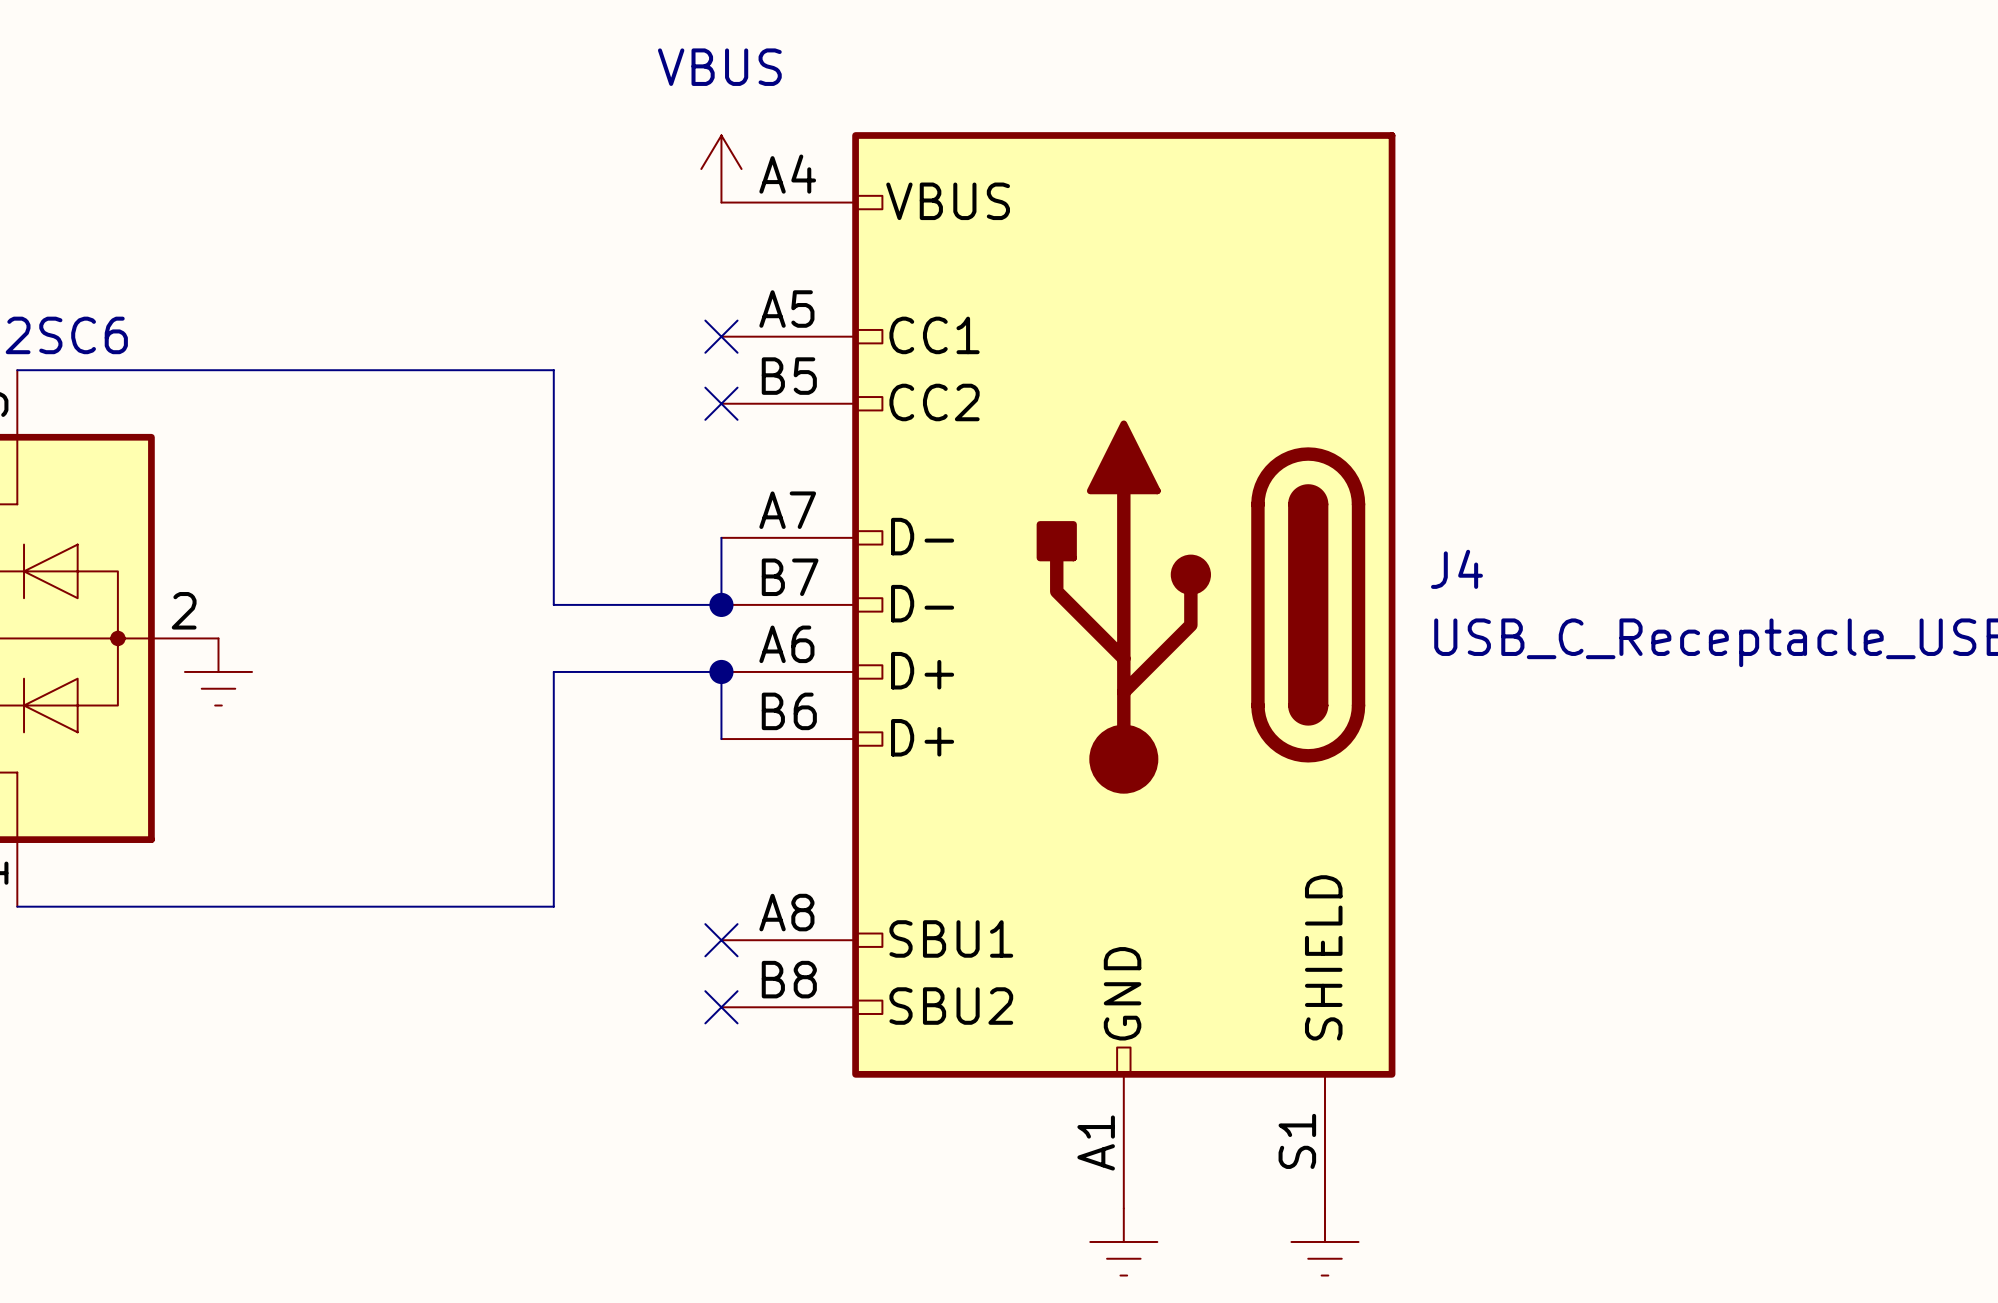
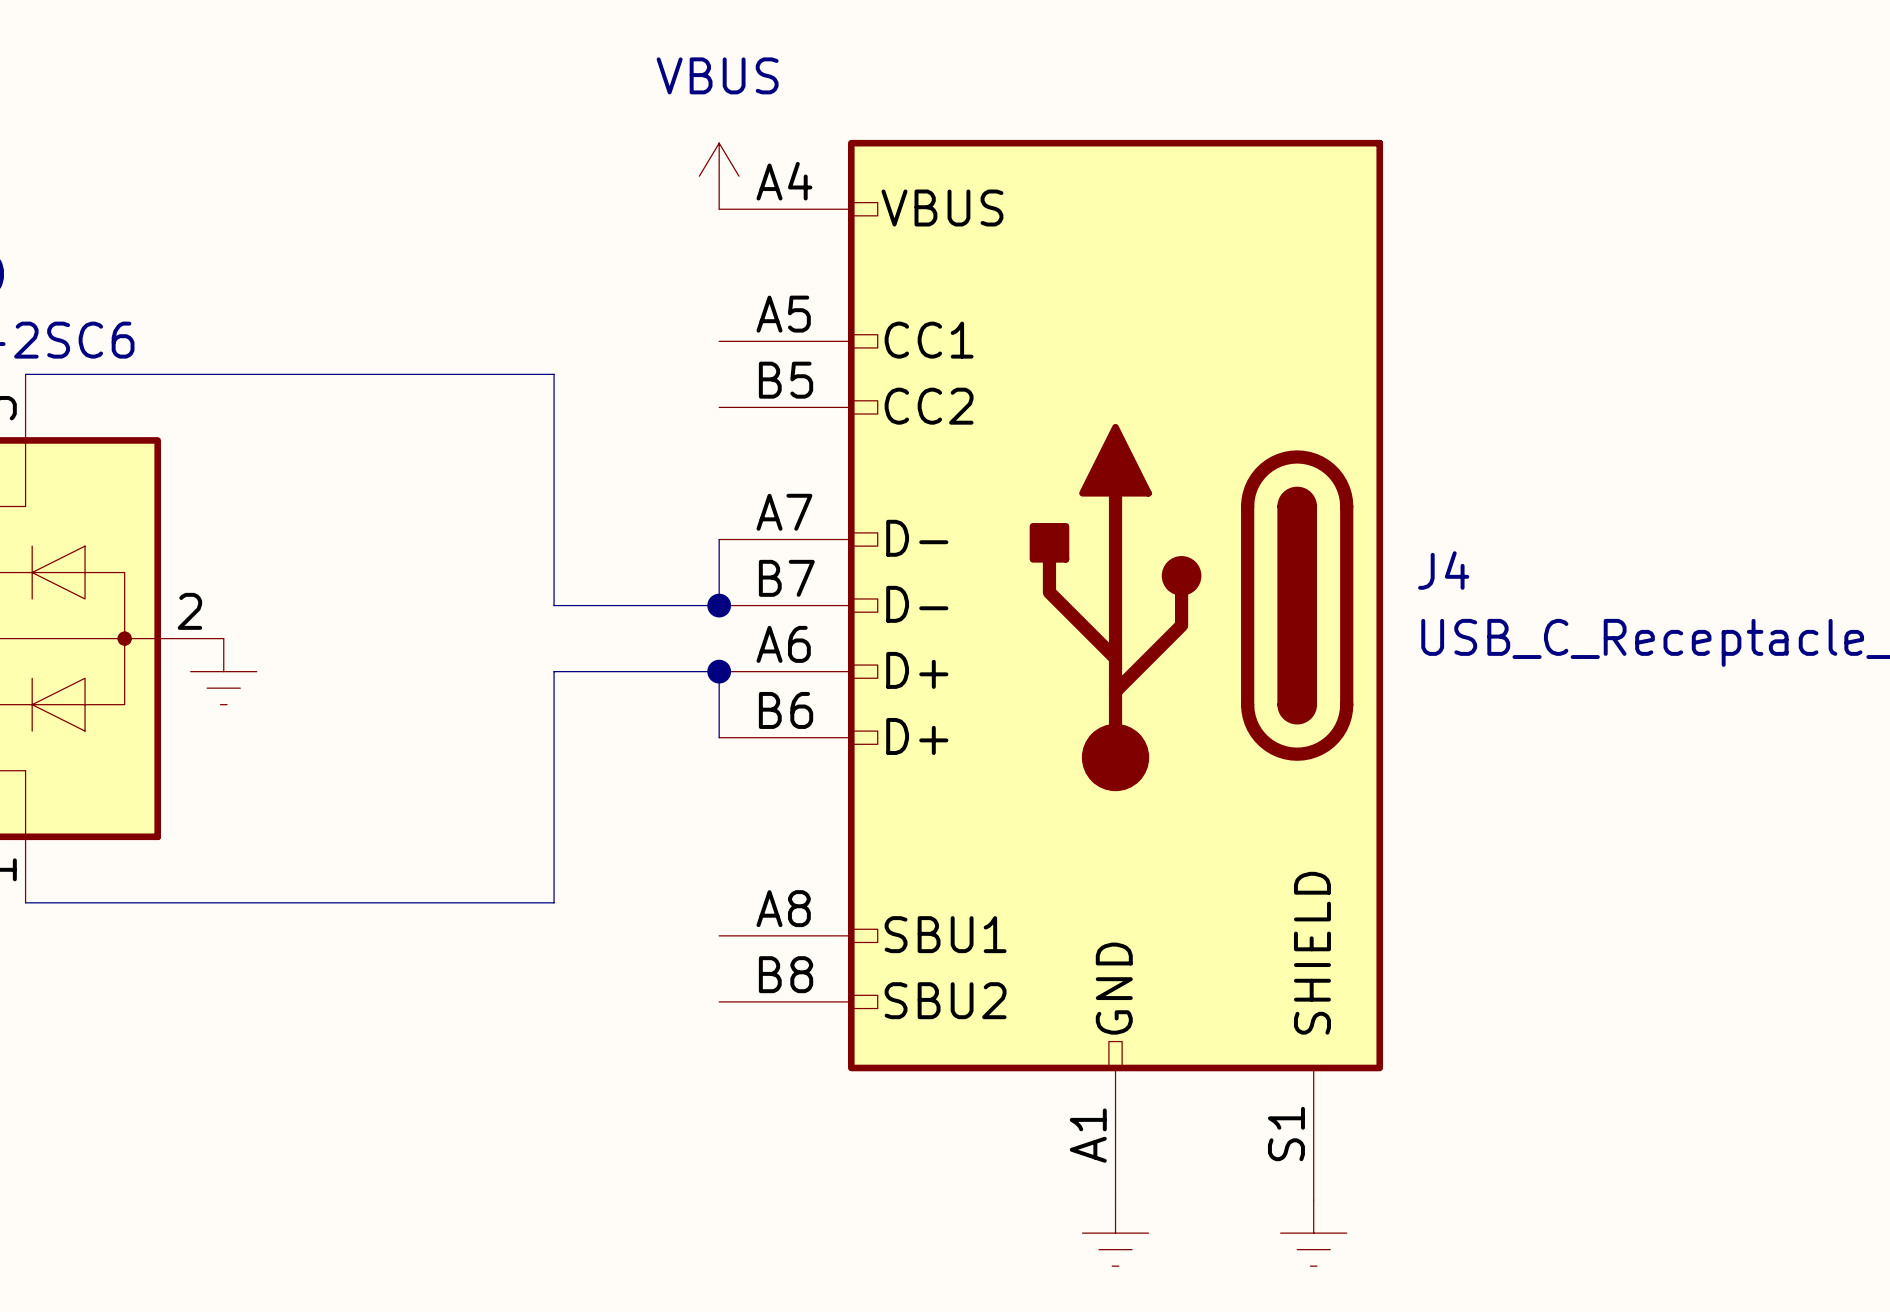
no-connect mark: (721, 336) -> none
no-connect mark: (721, 403) -> none
no-connect mark: (721, 940) -> none
no-connect mark: (721, 1007) -> none

